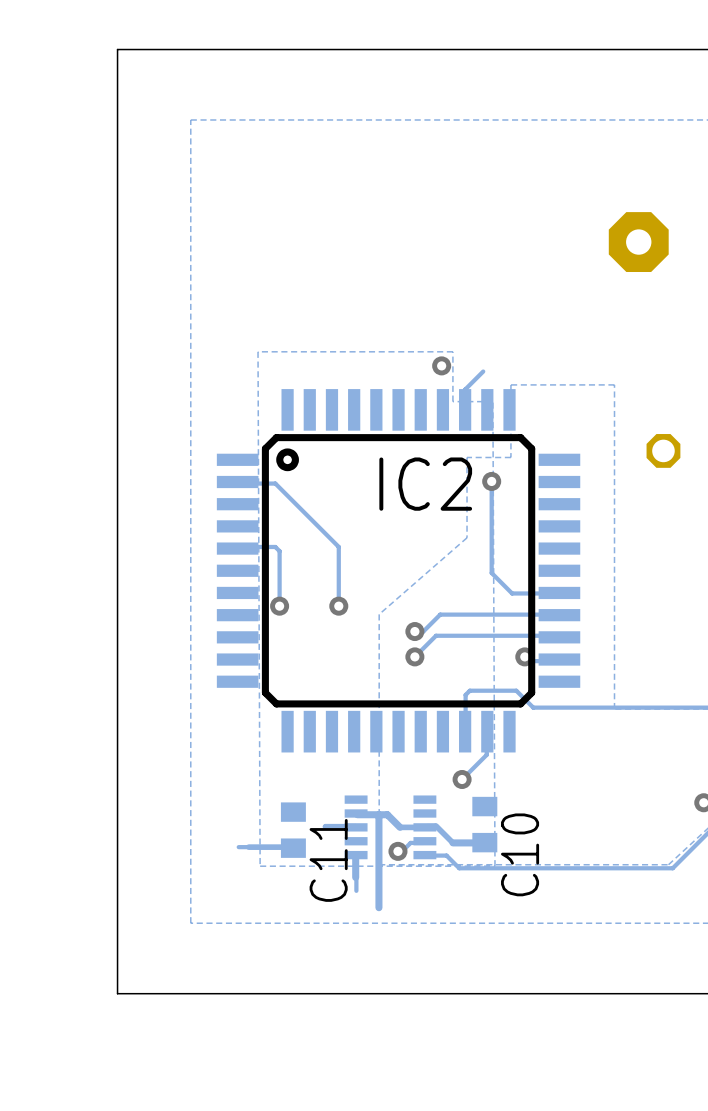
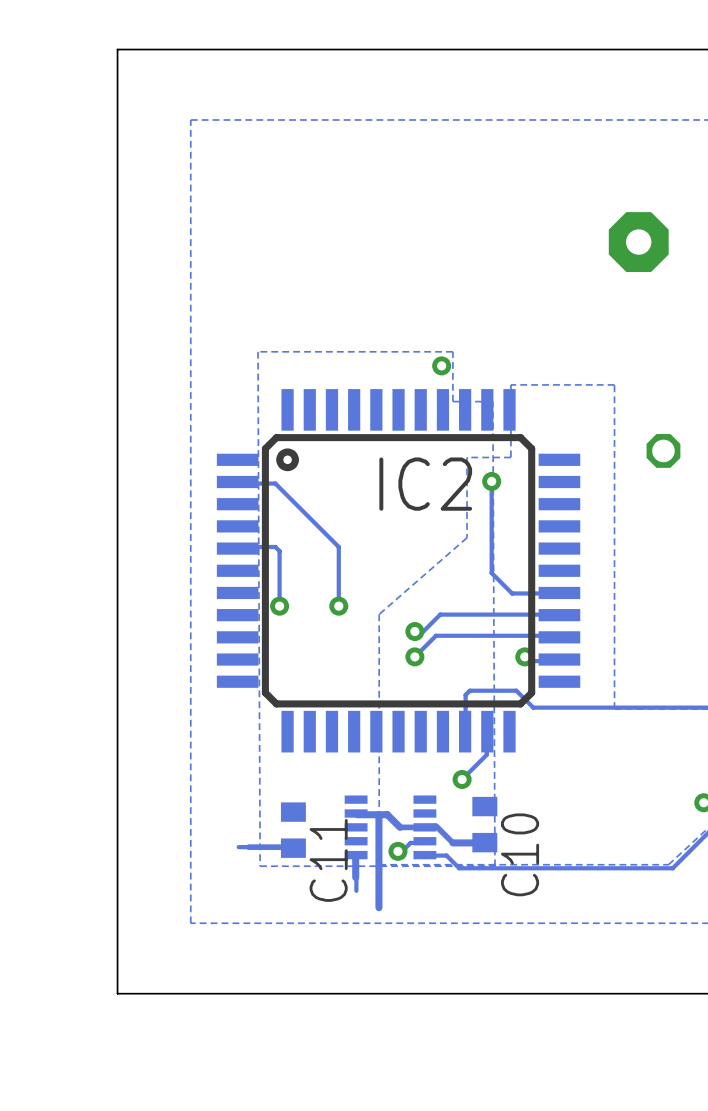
track: (483, 371) (465, 389) (465, 409) -> none
track: (355, 826) (324, 826) -> none

